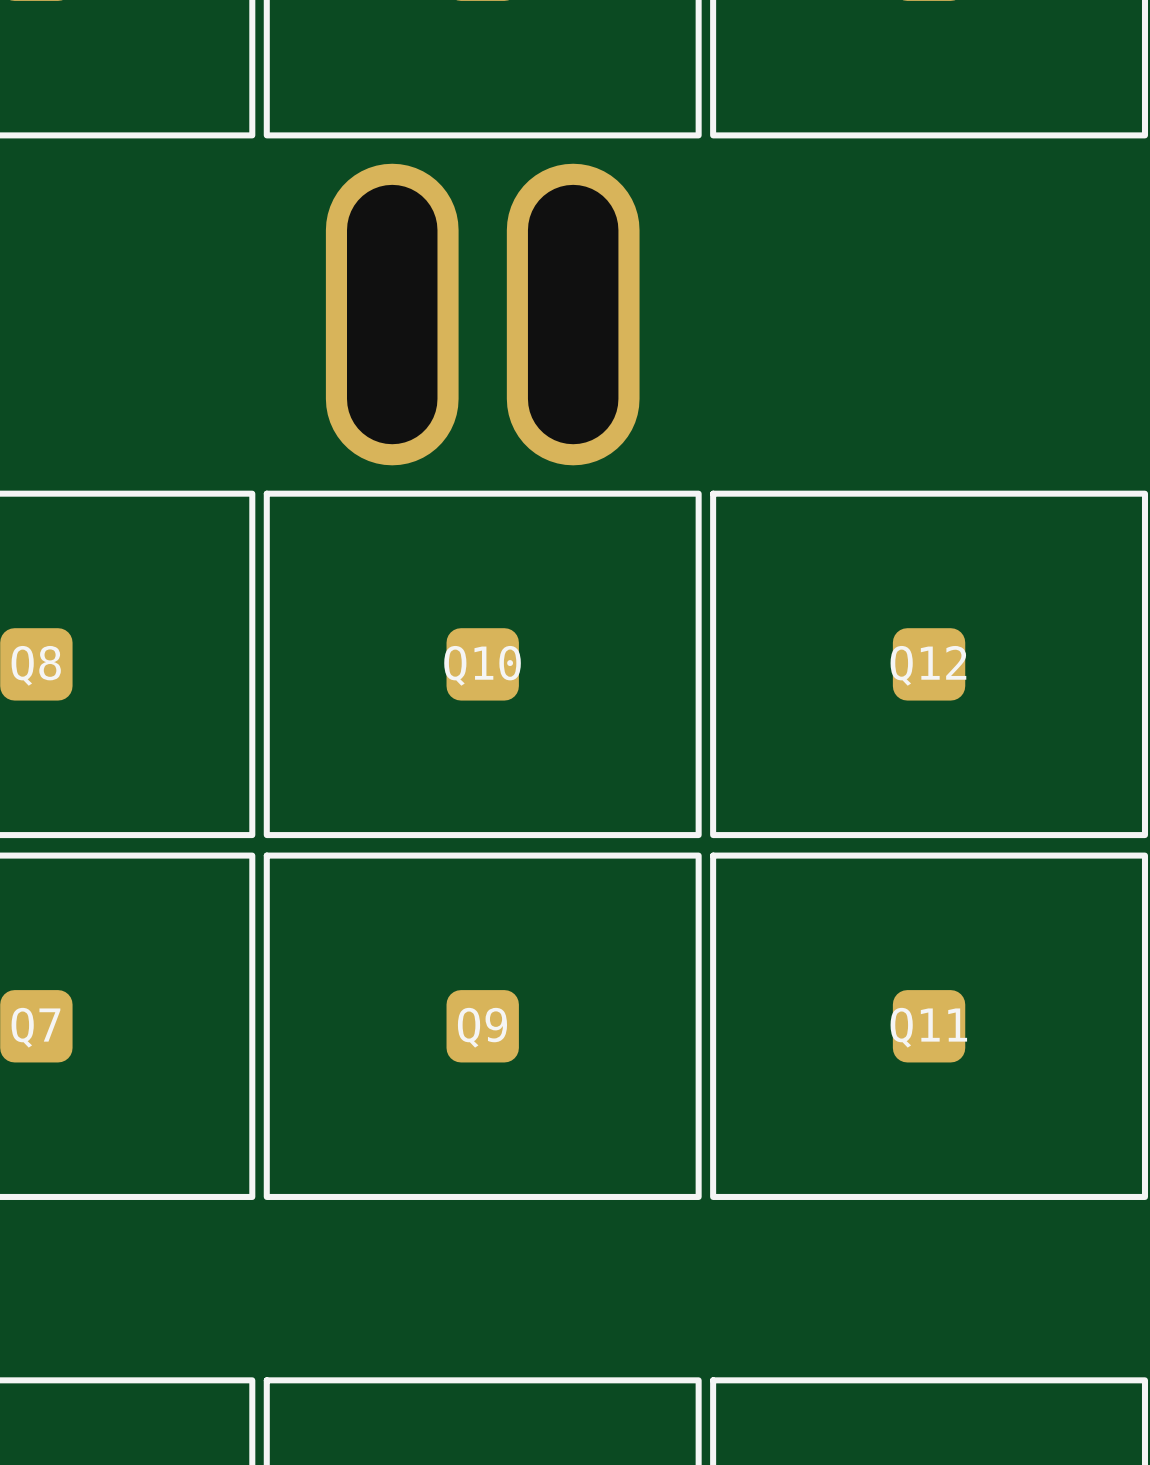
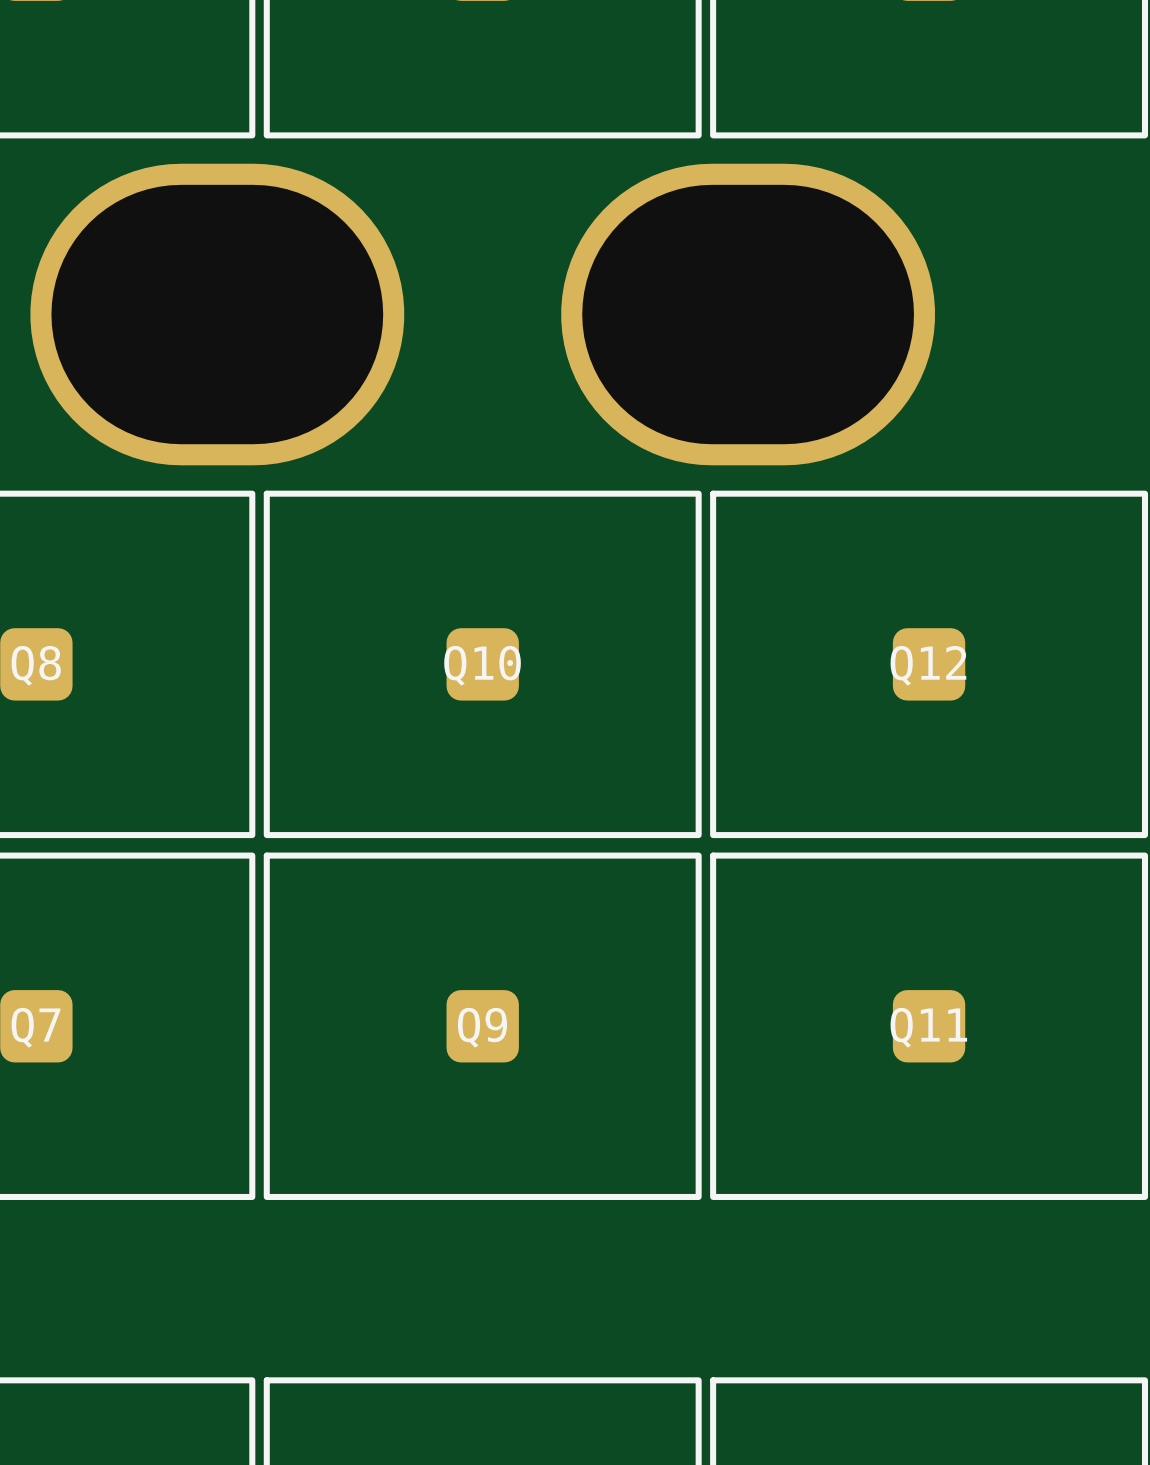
part: none -> (217, 314)
part: (392, 314) -> none
part: (573, 314) -> none
part: none -> (748, 314)

